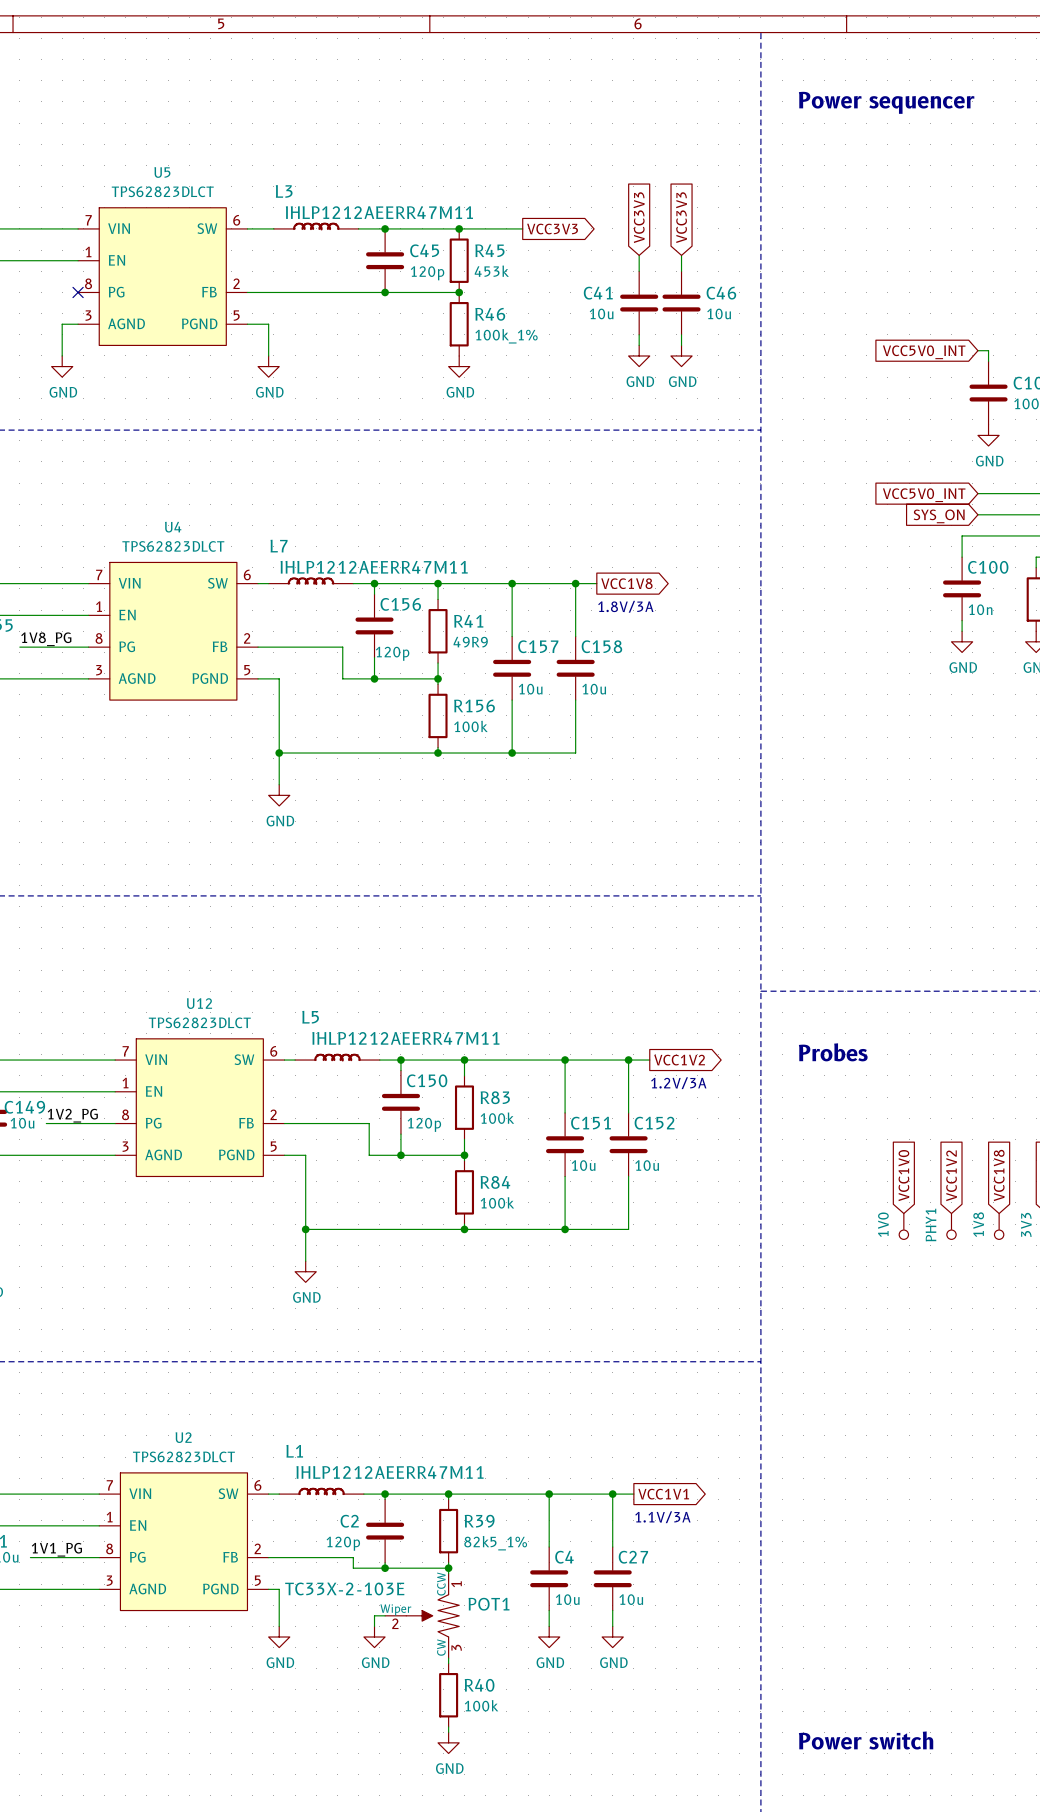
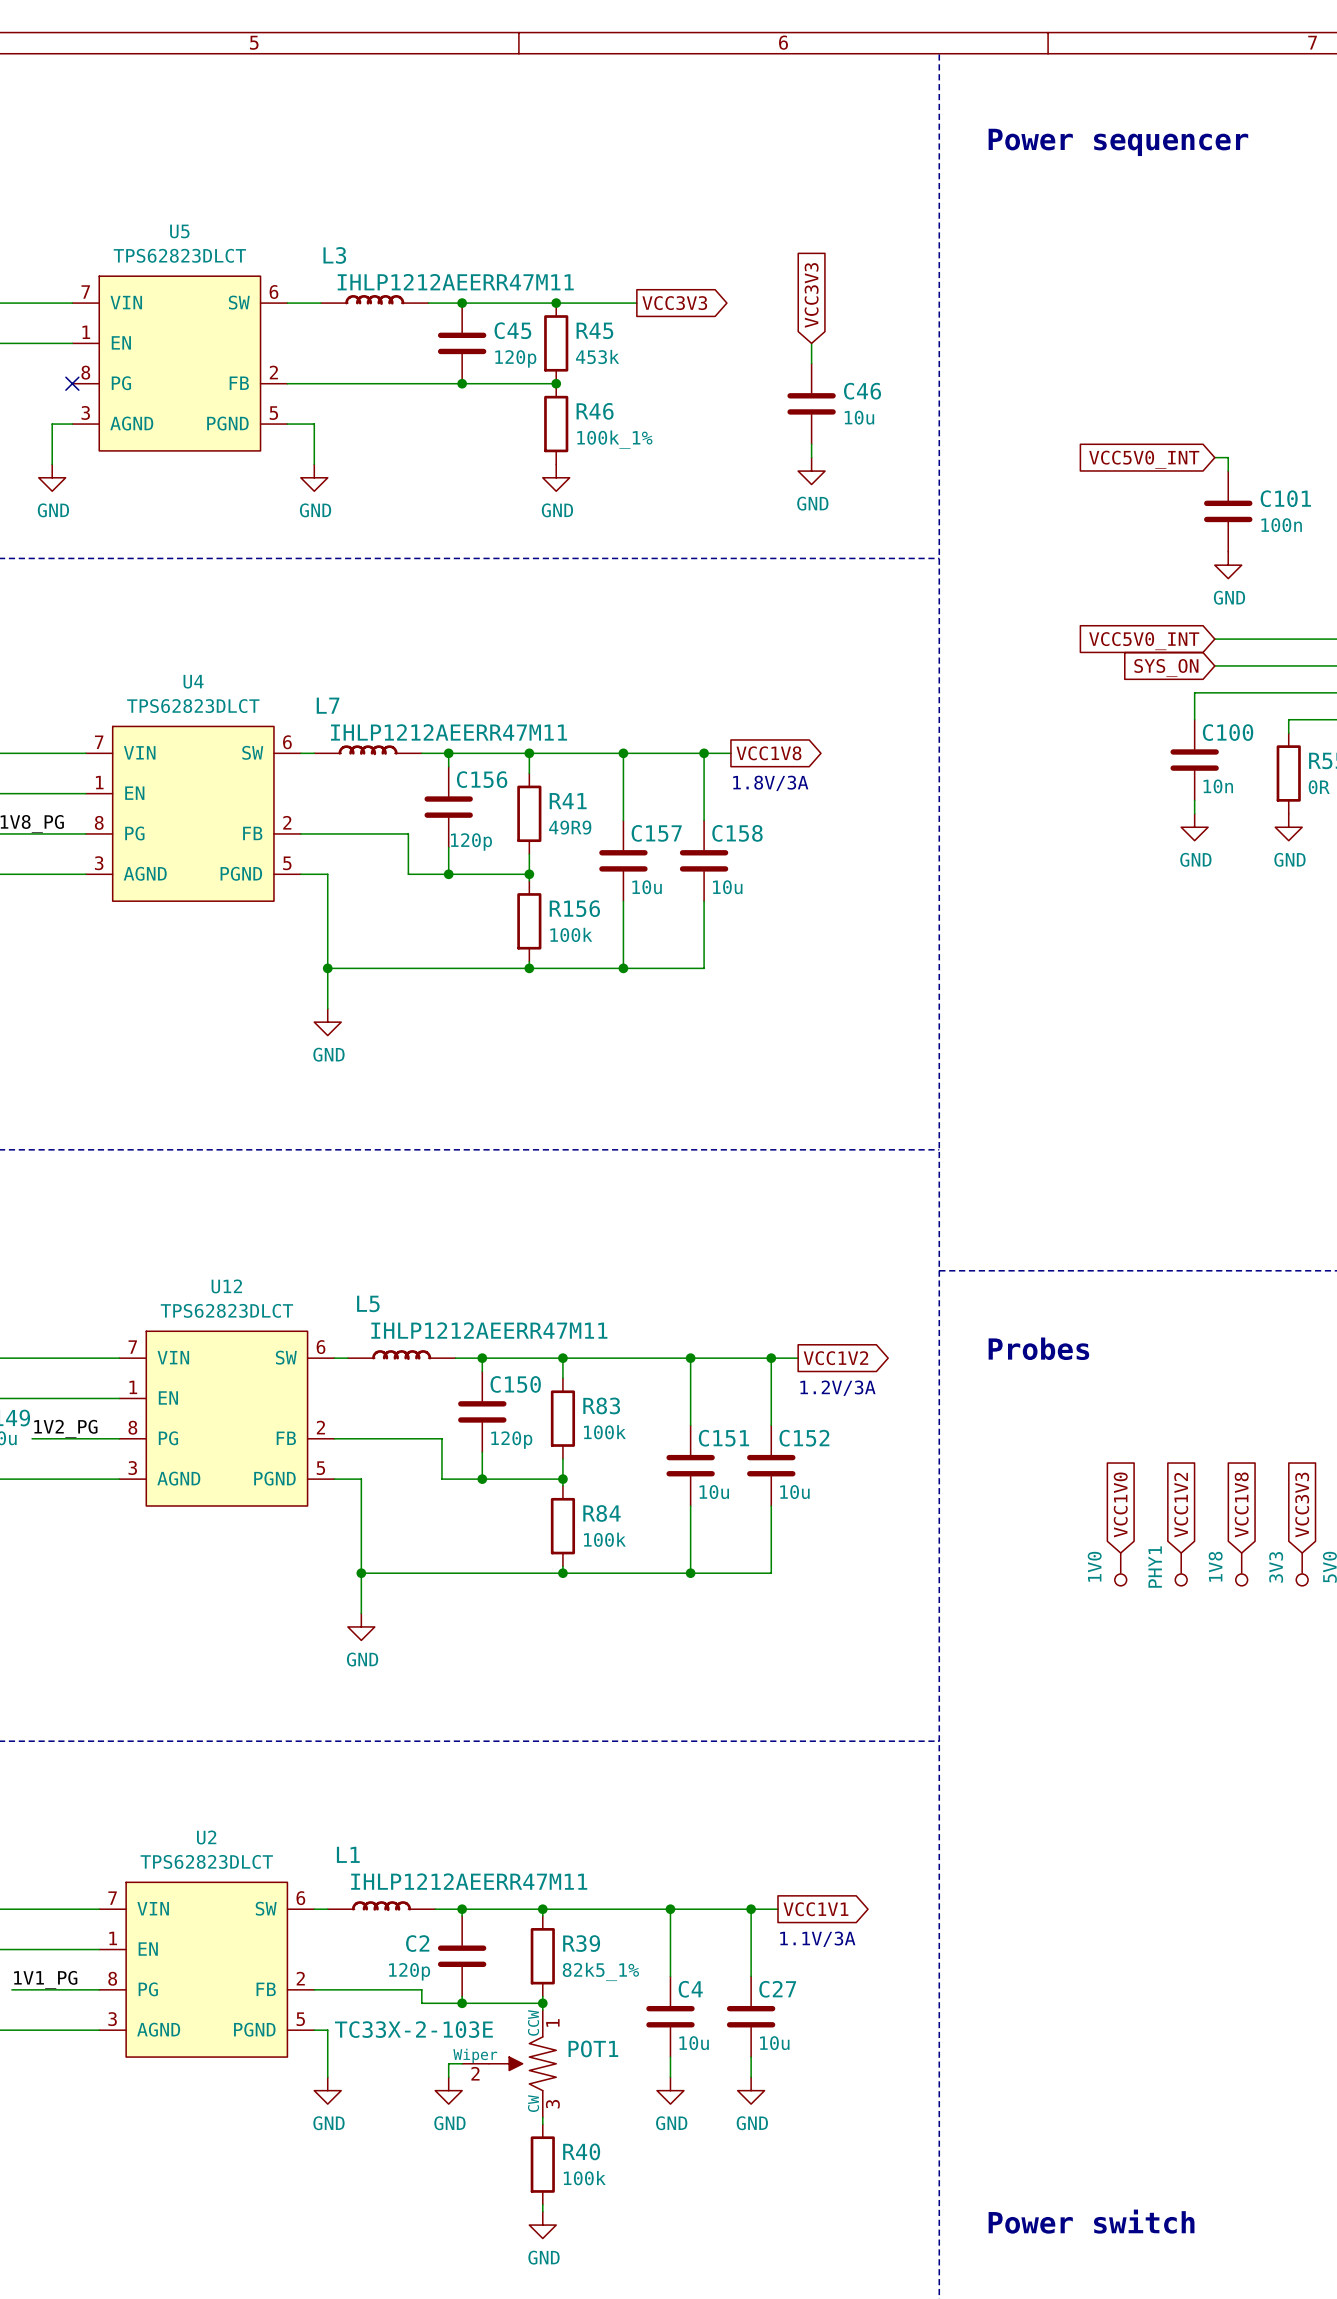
global label: VCC3V3 (639, 217) -> none
global label: VCC3V3 (681, 217) -> none
global label: none -> VCC3V3 (811, 295)
wire: (639, 255) (639, 271) -> (811, 343) (811, 363)
wire: (681, 255) (681, 271) -> none
C41: (639, 303) -> none
C46 position: (681, 303) -> (811, 403)
wire: (639, 334) (639, 345) -> (811, 444) (811, 457)
wire: (681, 334) (681, 345) -> none
power symbol: GND (639, 355) -> none
power symbol: GND (681, 355) -> none
power symbol: none -> GND (811, 471)

